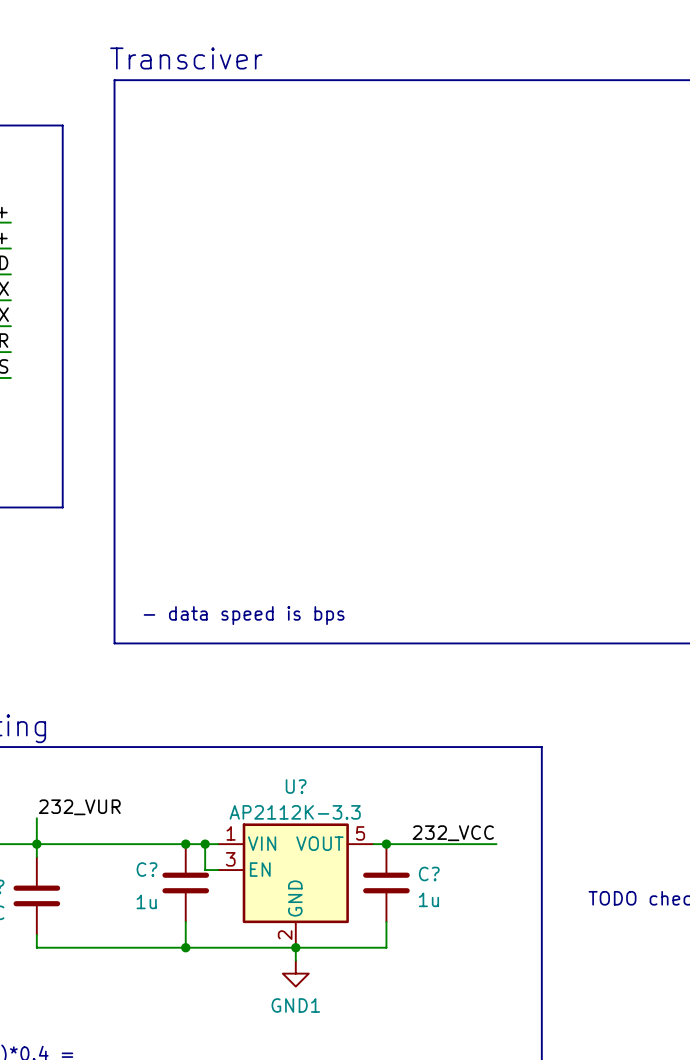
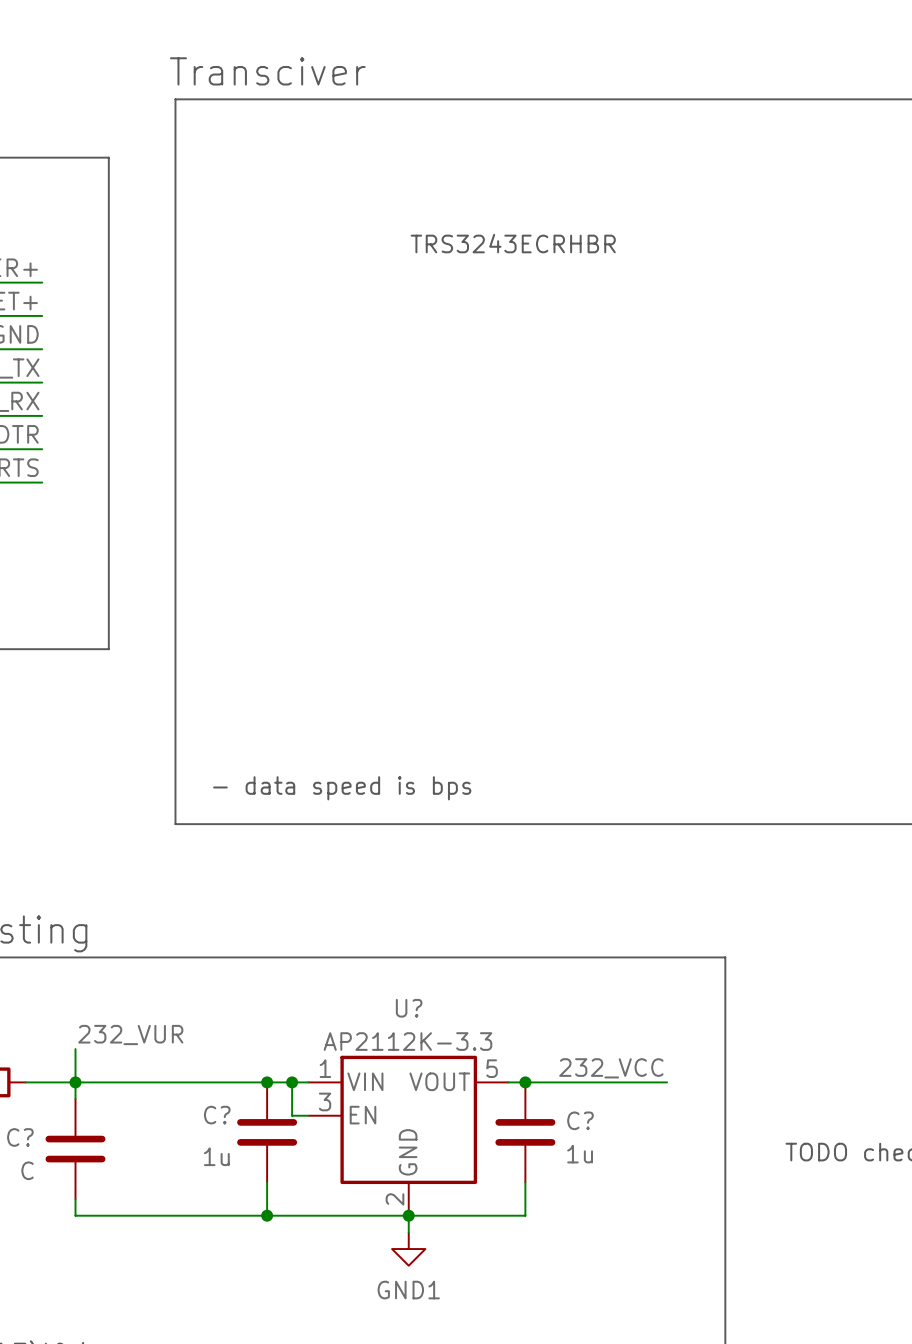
text: none -> TRS3243ECRHBR (513, 243)

